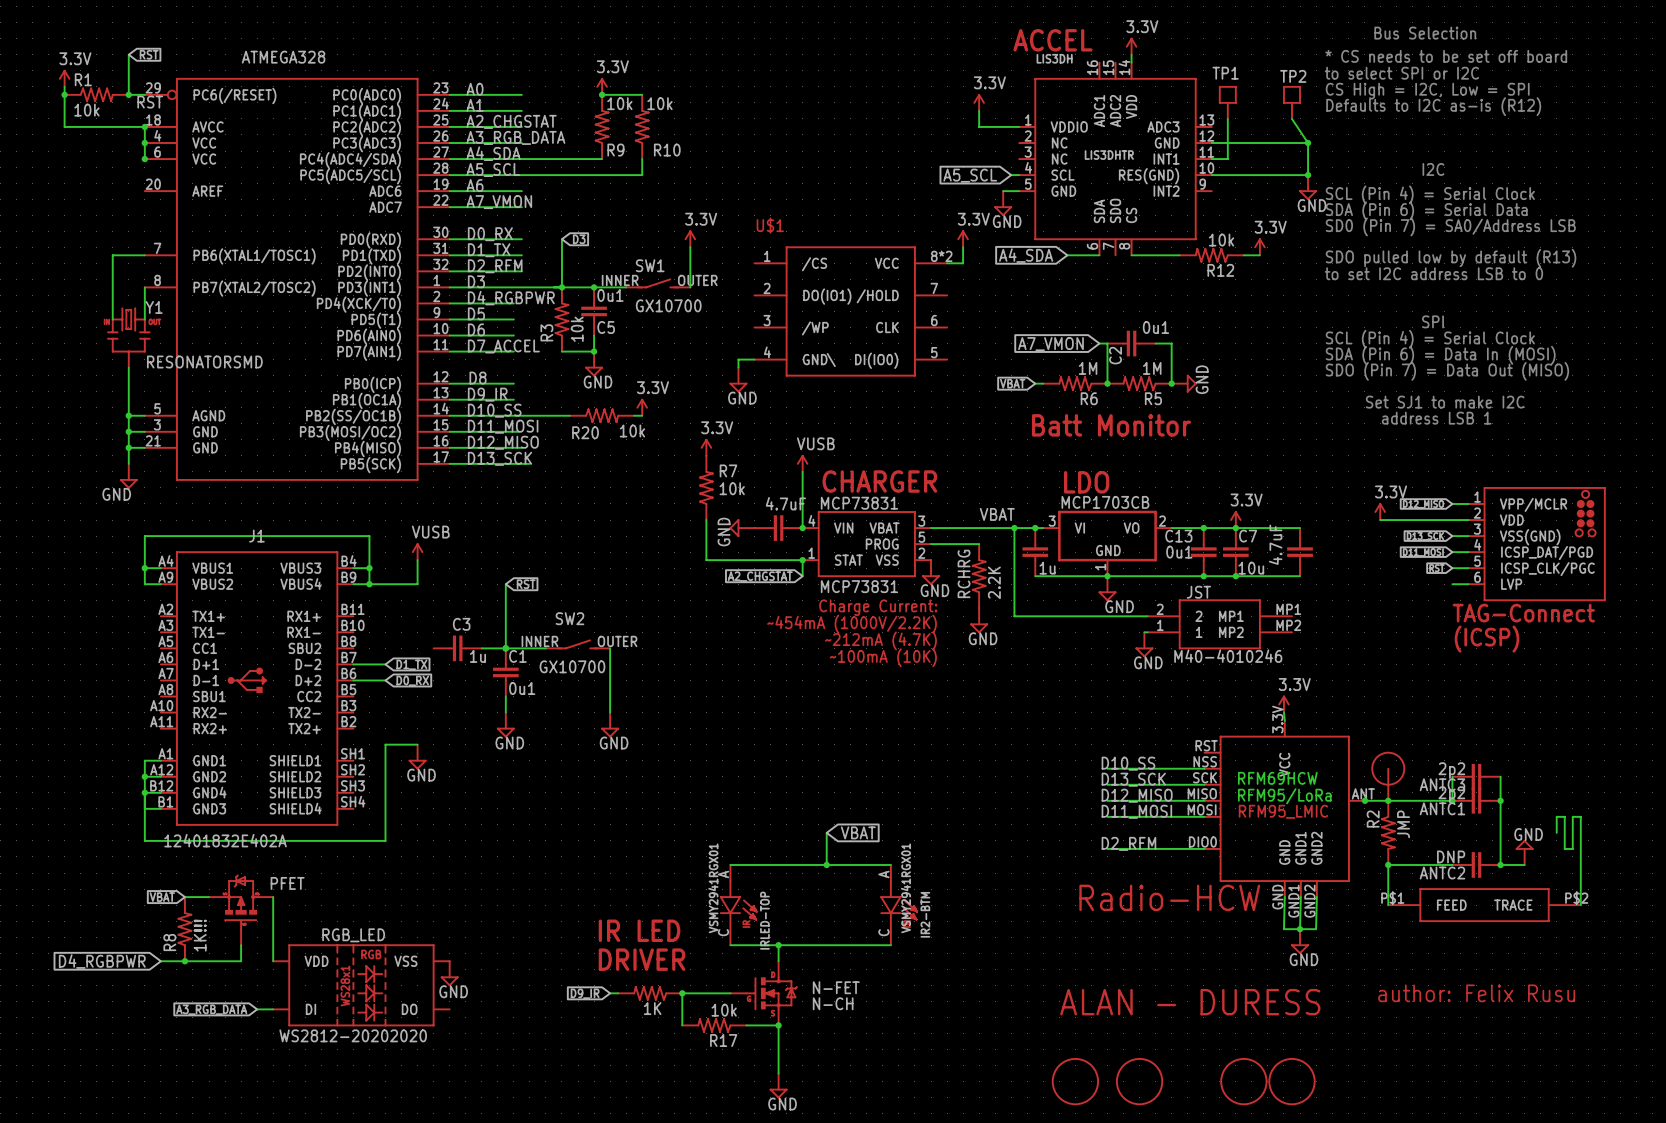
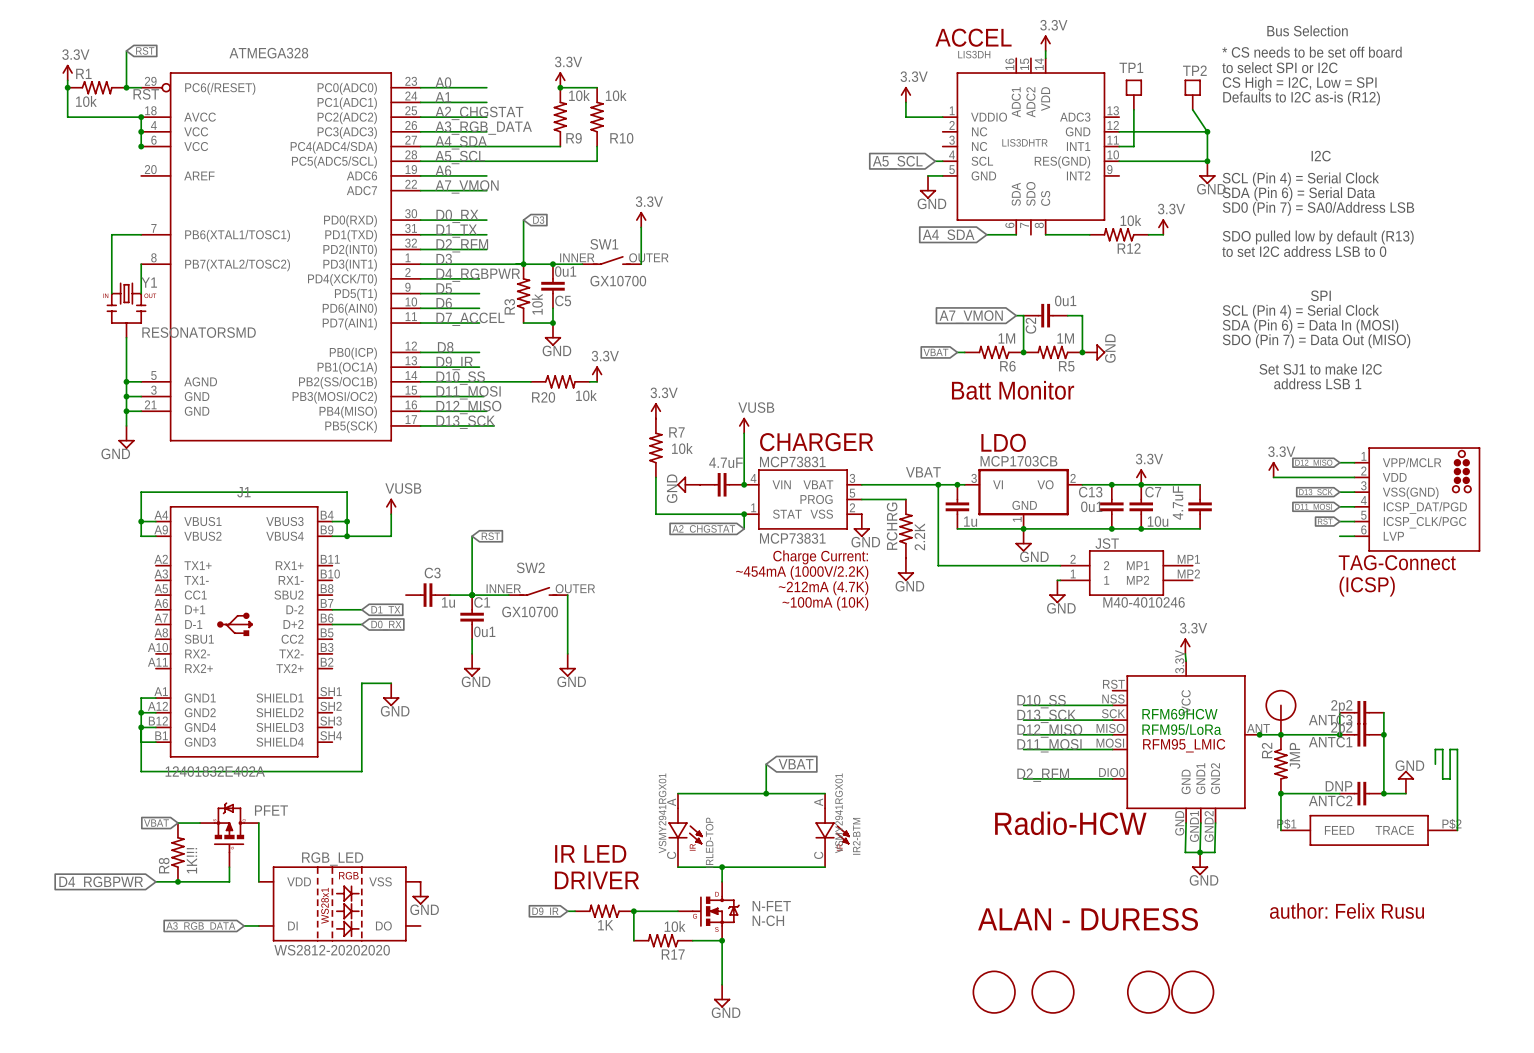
power symbol: 3.3V (963, 238) -> none
wire: (963, 247) (963, 263) (947, 263) -> none
part: (850, 311) -> none
wire: (754, 359) (738, 359) (738, 367) -> none
power symbol: GND (738, 380) -> none

